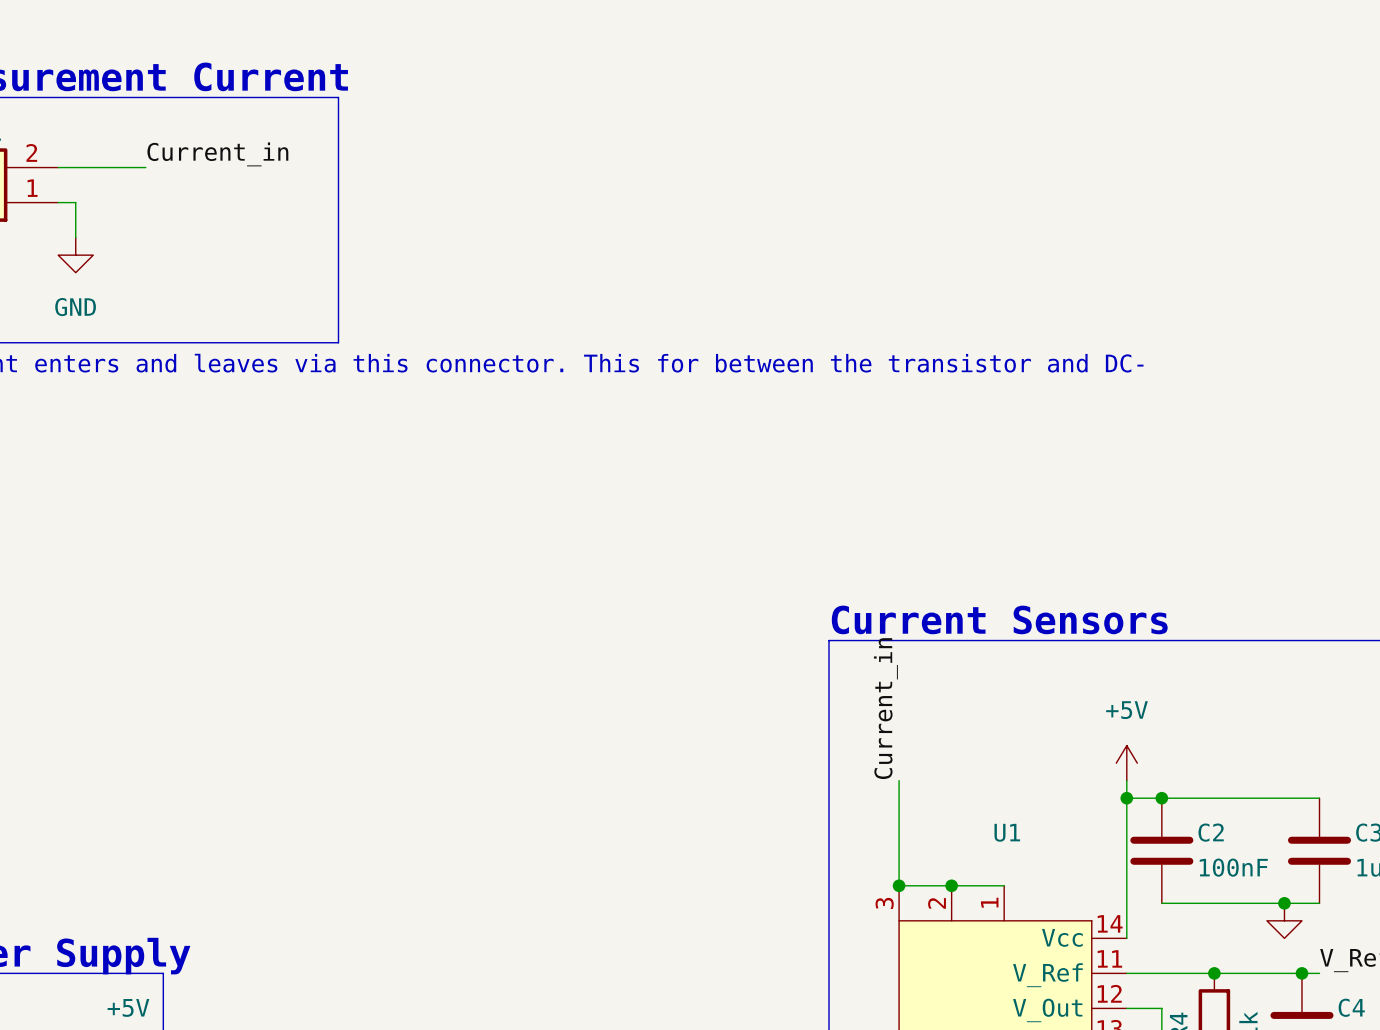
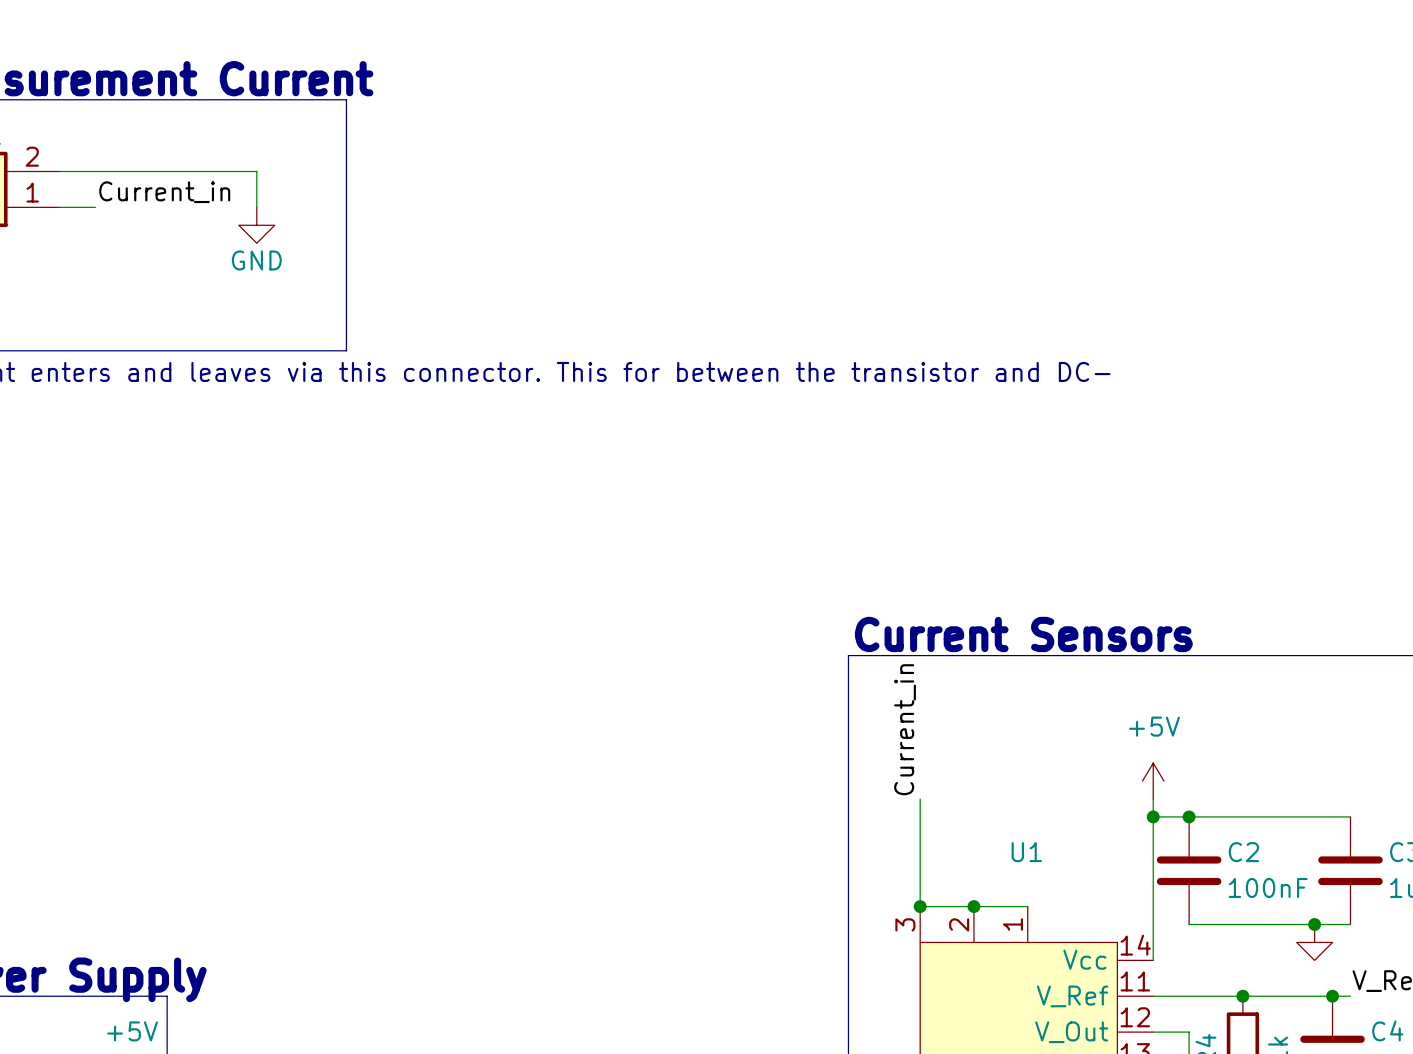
label position: Current_in (217, 154) -> Current_in (164, 192)
wire: none -> (149, 171) (256, 171) (256, 207)
wire: (75, 202) (75, 237) -> (77, 207) (95, 207)
power symbol position: GND (75, 255) -> GND (256, 225)
power symbol text position: GND (75, 307) -> GND (256, 260)

